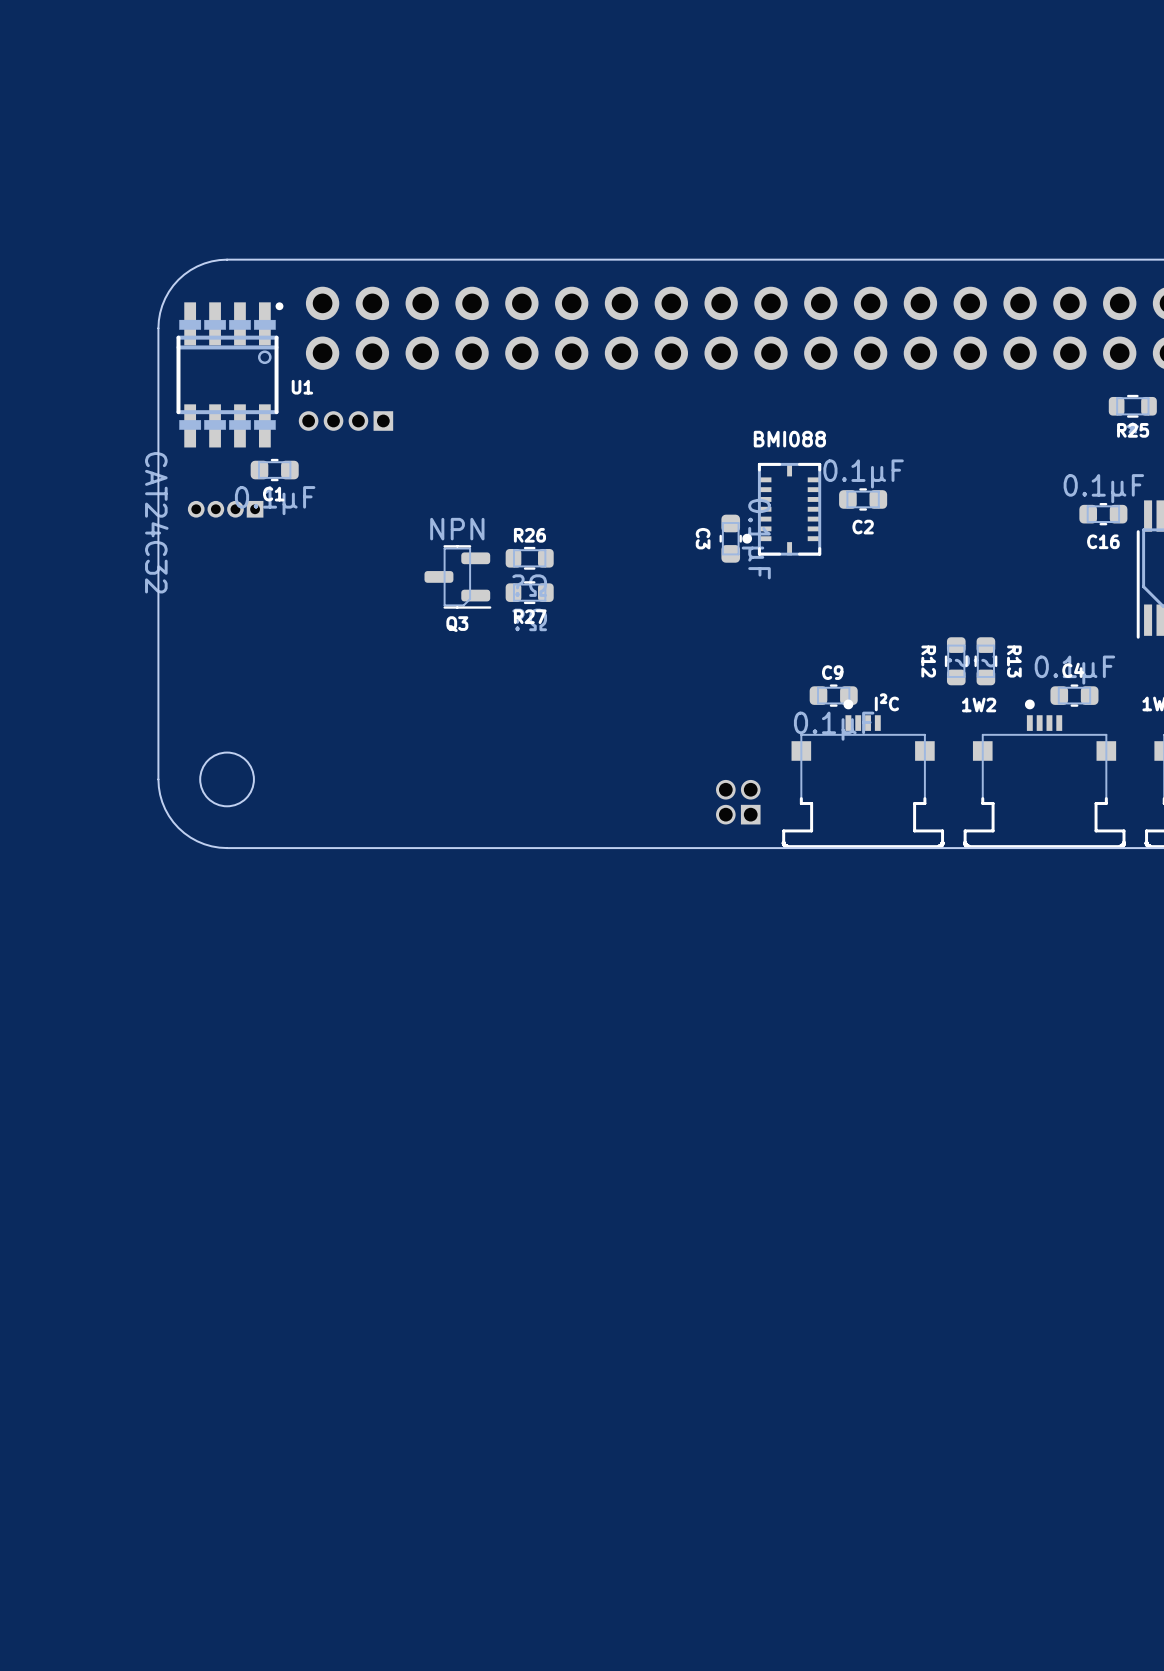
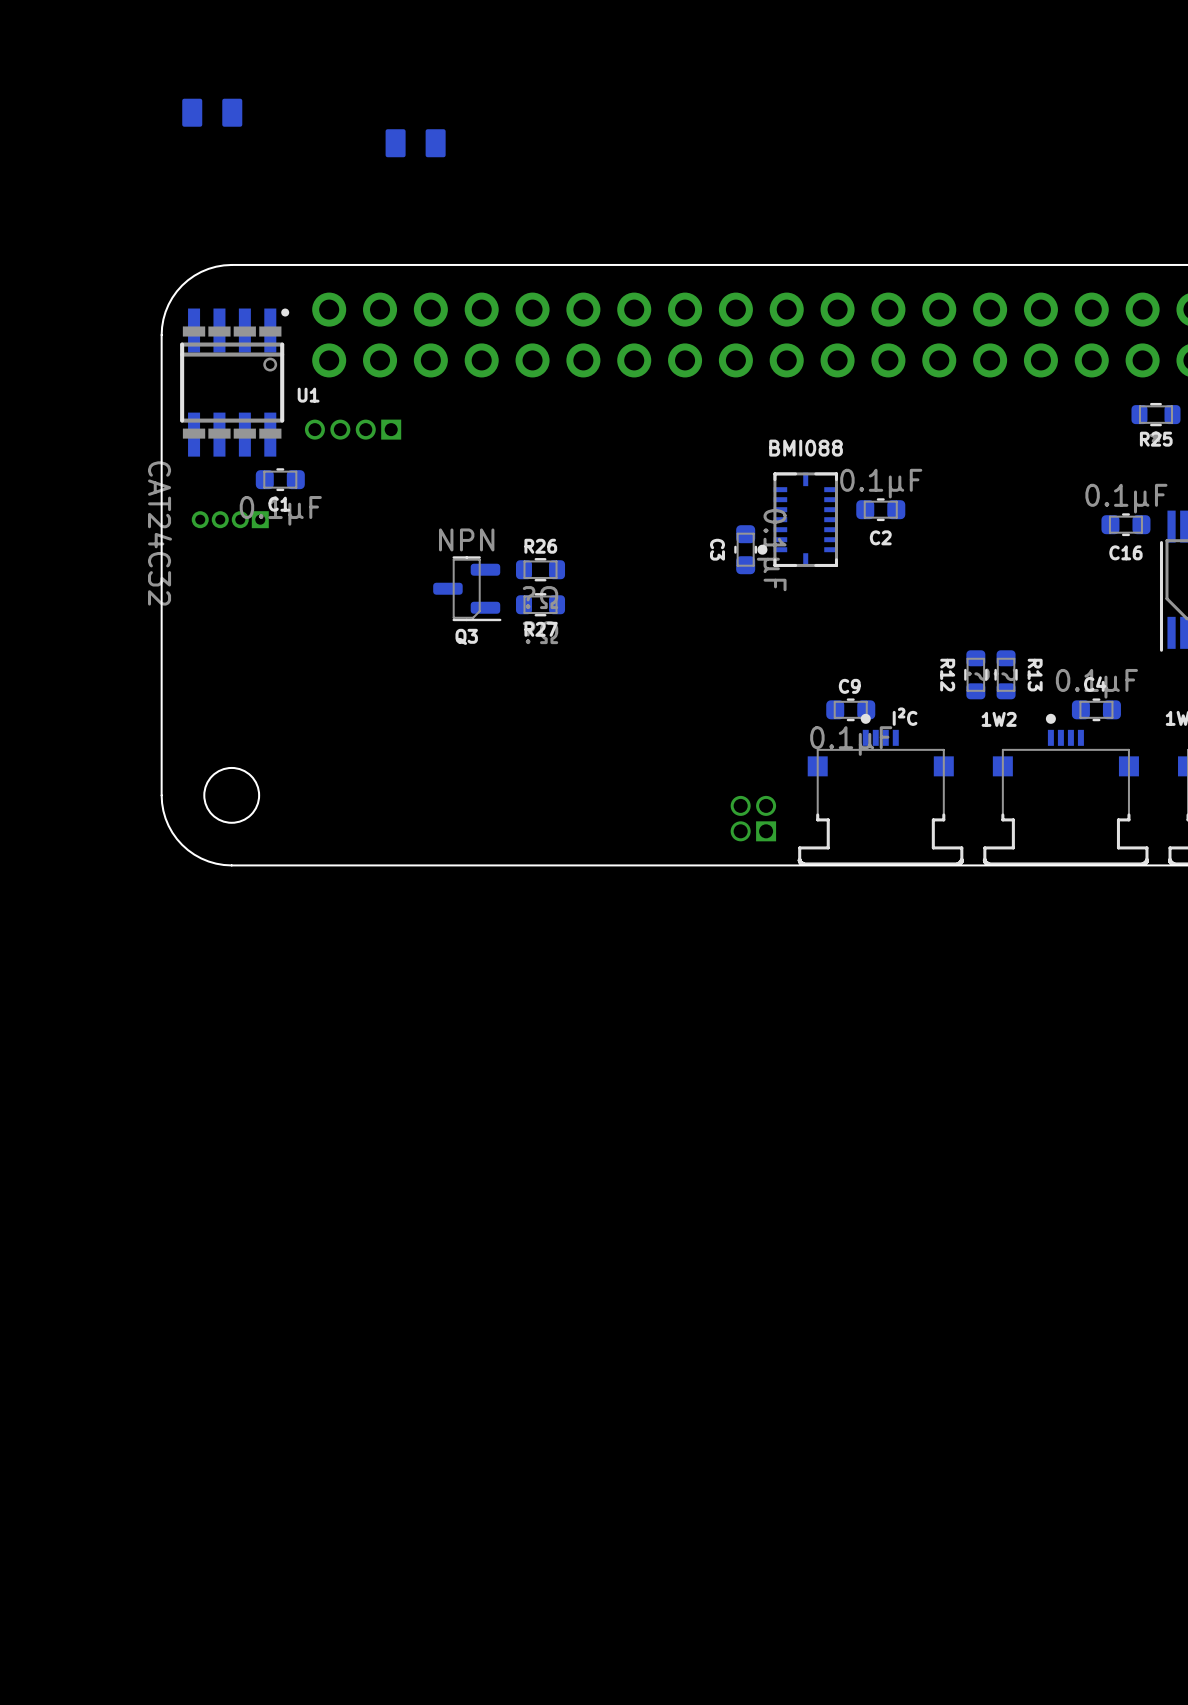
part: none -> (212, 112)
part: none -> (415, 143)

